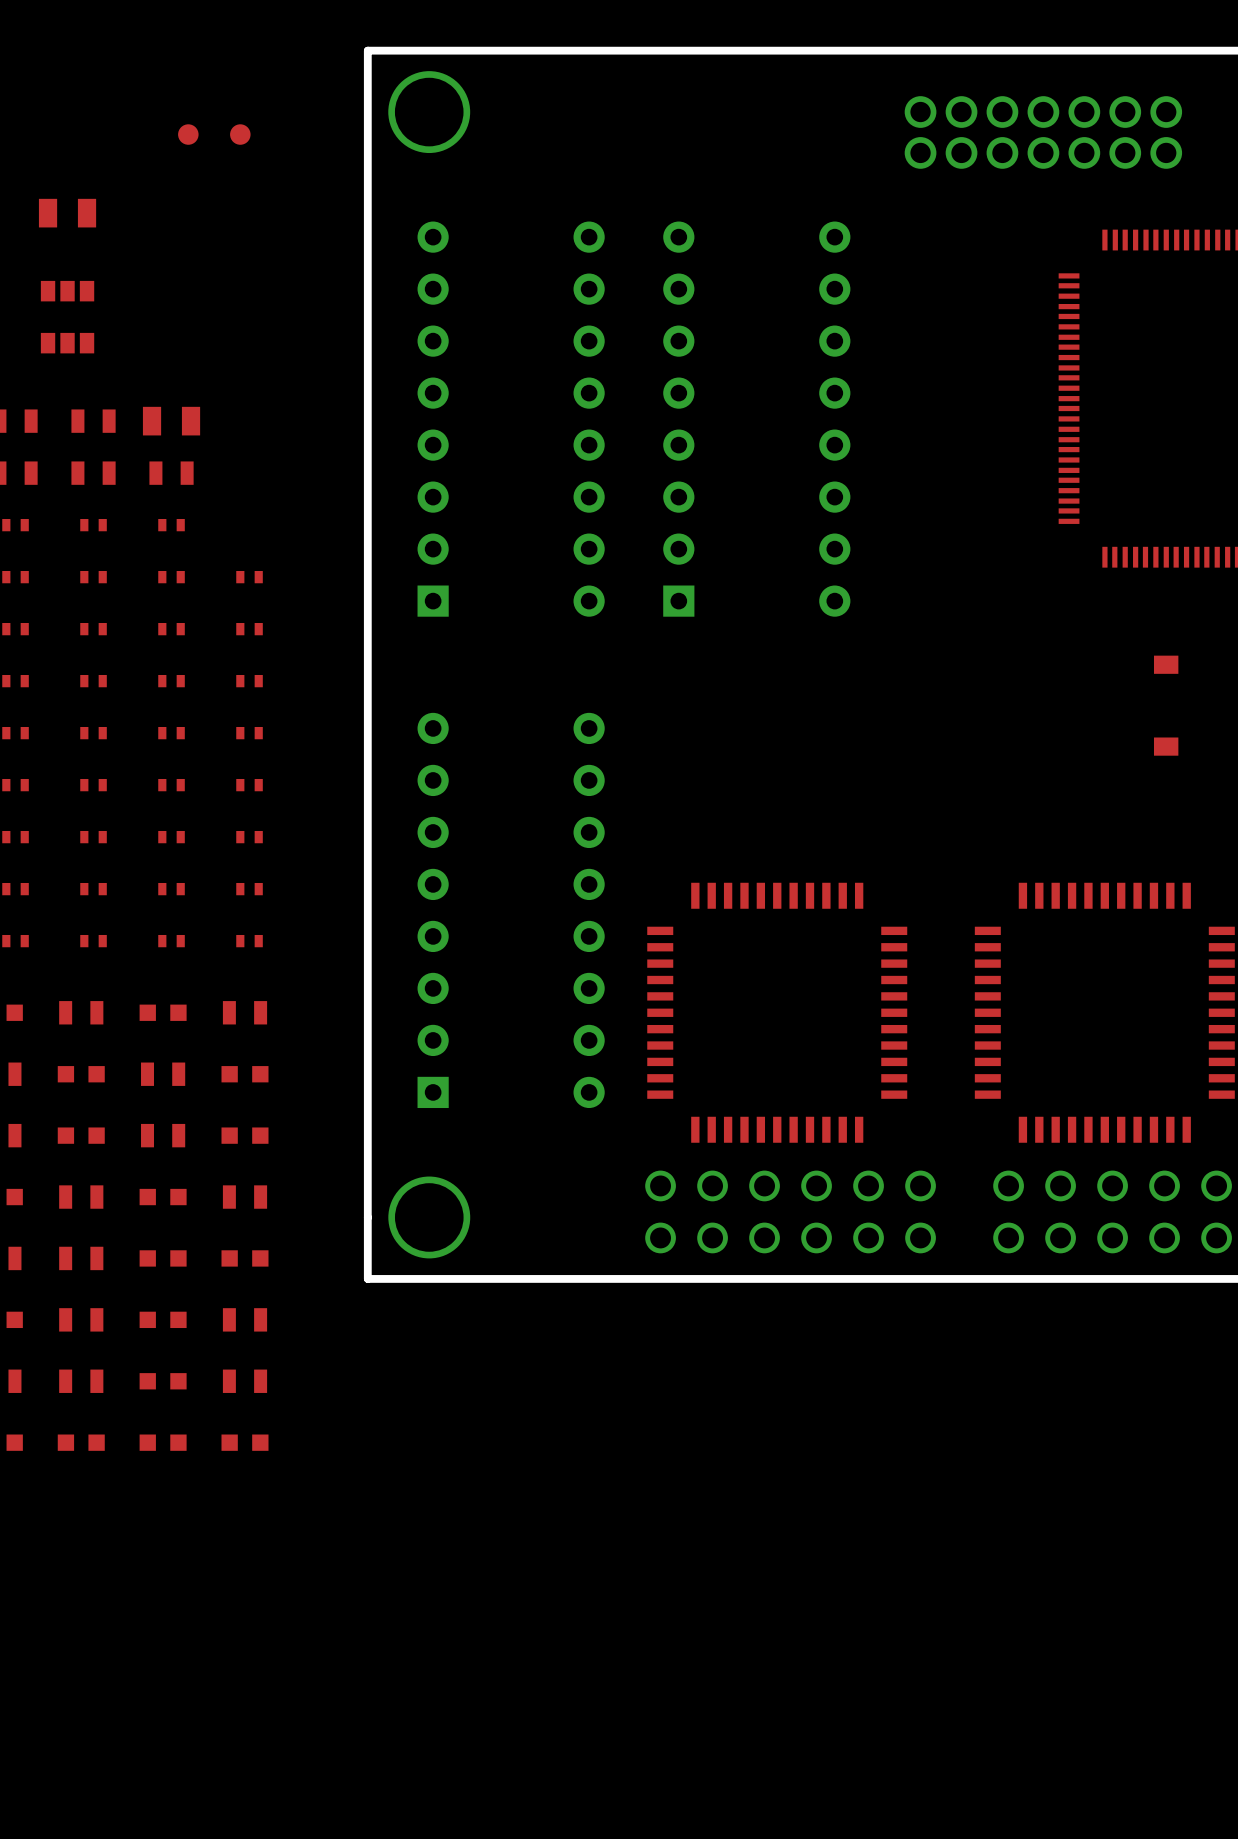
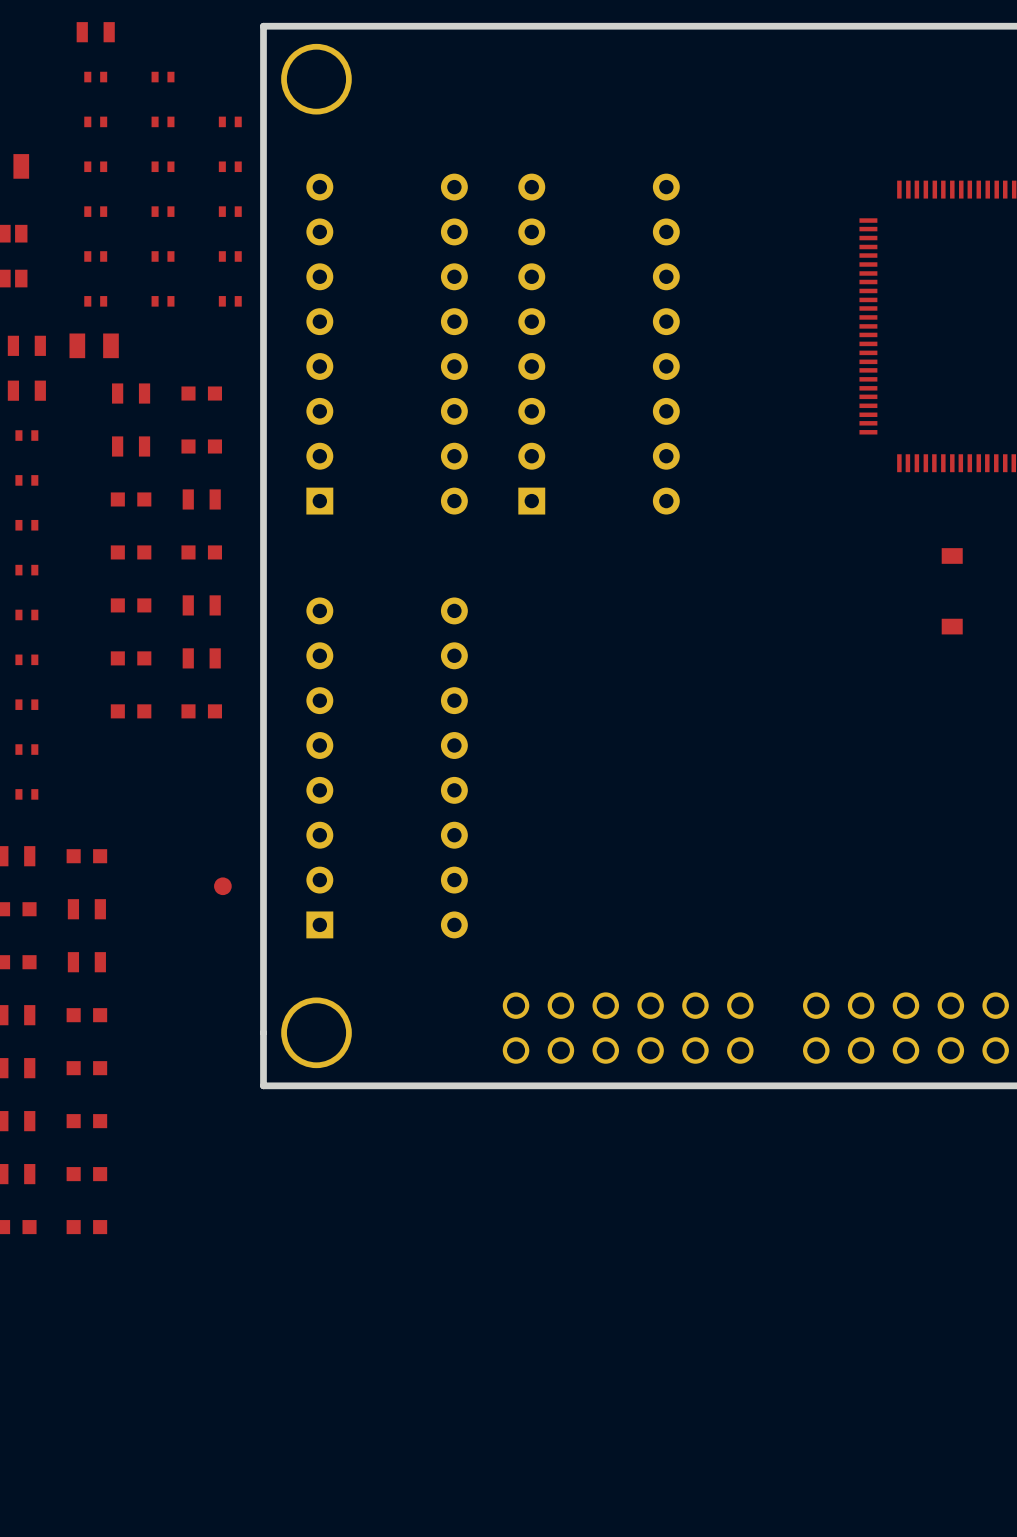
part: none -> (95, 32)
part: none -> (95, 77)
part: none -> (163, 77)
part: (1043, 132) -> none
part: (188, 134) -> none
part: (240, 134) -> none
part: none -> (95, 121)
part: none -> (163, 121)
part: none -> (230, 121)
part: none -> (95, 166)
part: none -> (163, 166)
part: none -> (230, 166)
part: none -> (95, 211)
part: none -> (163, 211)
part: none -> (230, 211)
part: none -> (95, 256)
part: none -> (163, 256)
part: none -> (230, 256)
part: none -> (95, 301)
part: none -> (163, 301)
part: none -> (230, 301)
part: (171, 473) -> none
part: none -> (131, 393)
part: none -> (201, 393)
part: (171, 525) -> none
part: none -> (131, 446)
part: none -> (201, 446)
part: (171, 577) -> none
part: (249, 577) -> none
part: none -> (131, 499)
part: none -> (201, 499)
part: (171, 629) -> none
part: (249, 629) -> none
part: none -> (131, 552)
part: none -> (201, 552)
part: (171, 681) -> none
part: (249, 681) -> none
part: none -> (131, 605)
part: none -> (201, 605)
part: (171, 733) -> none
part: (249, 733) -> none
part: none -> (131, 658)
part: none -> (201, 658)
part: (171, 785) -> none
part: (249, 785) -> none
part: (171, 837) -> none
part: (249, 837) -> none
part: none -> (131, 711)
part: none -> (201, 711)
part: (171, 889) -> none
part: (249, 889) -> none
part: (171, 941) -> none
part: (249, 941) -> none
part: (245, 1012) -> none
part: (777, 1012) -> none
part: (1104, 1012) -> none
part: none -> (222, 886)
part: (245, 1074) -> none
part: (245, 1135) -> none
part: (245, 1197) -> none
part: (245, 1258) -> none
part: (245, 1319) -> none
part: (245, 1381) -> none
part: (245, 1442) -> none

